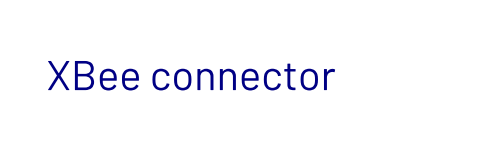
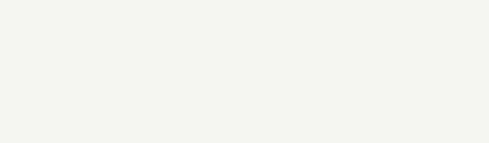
text: XBee connector (191, 75) -> none

